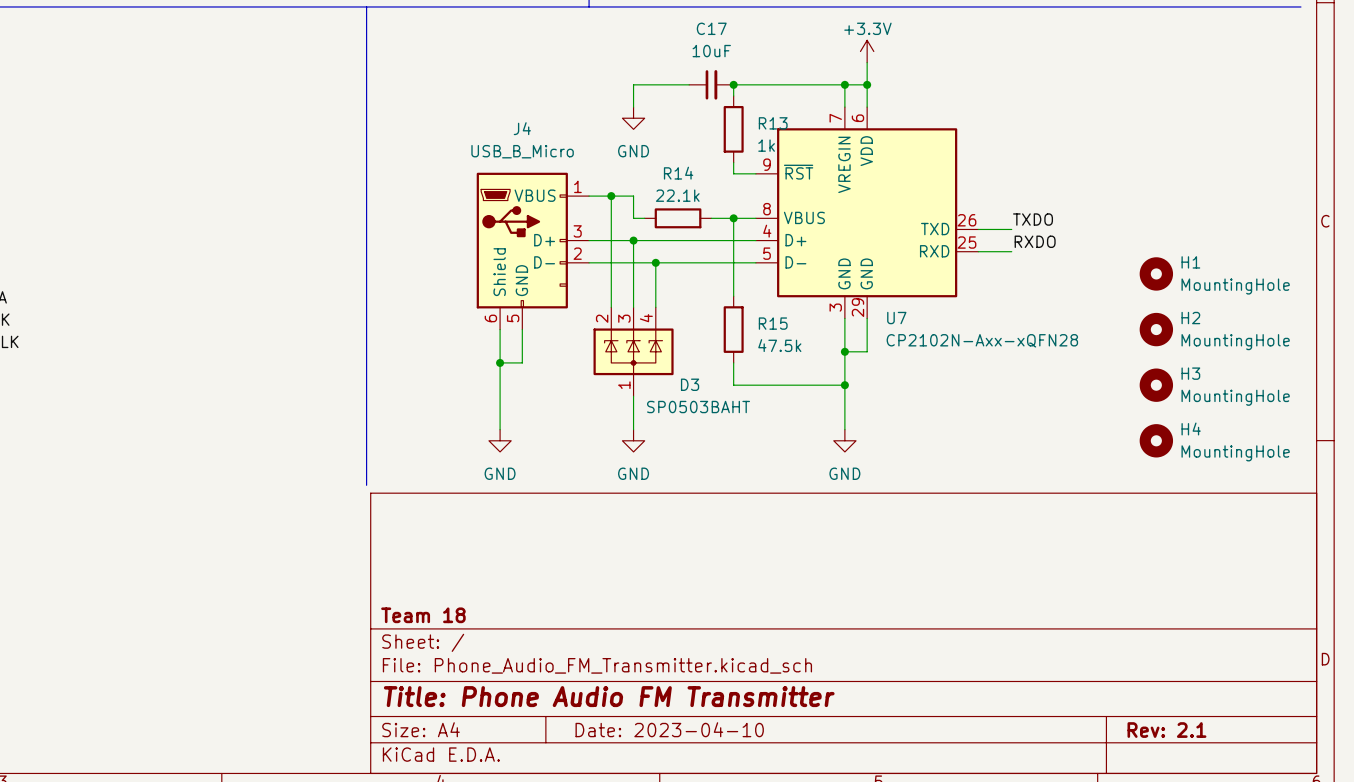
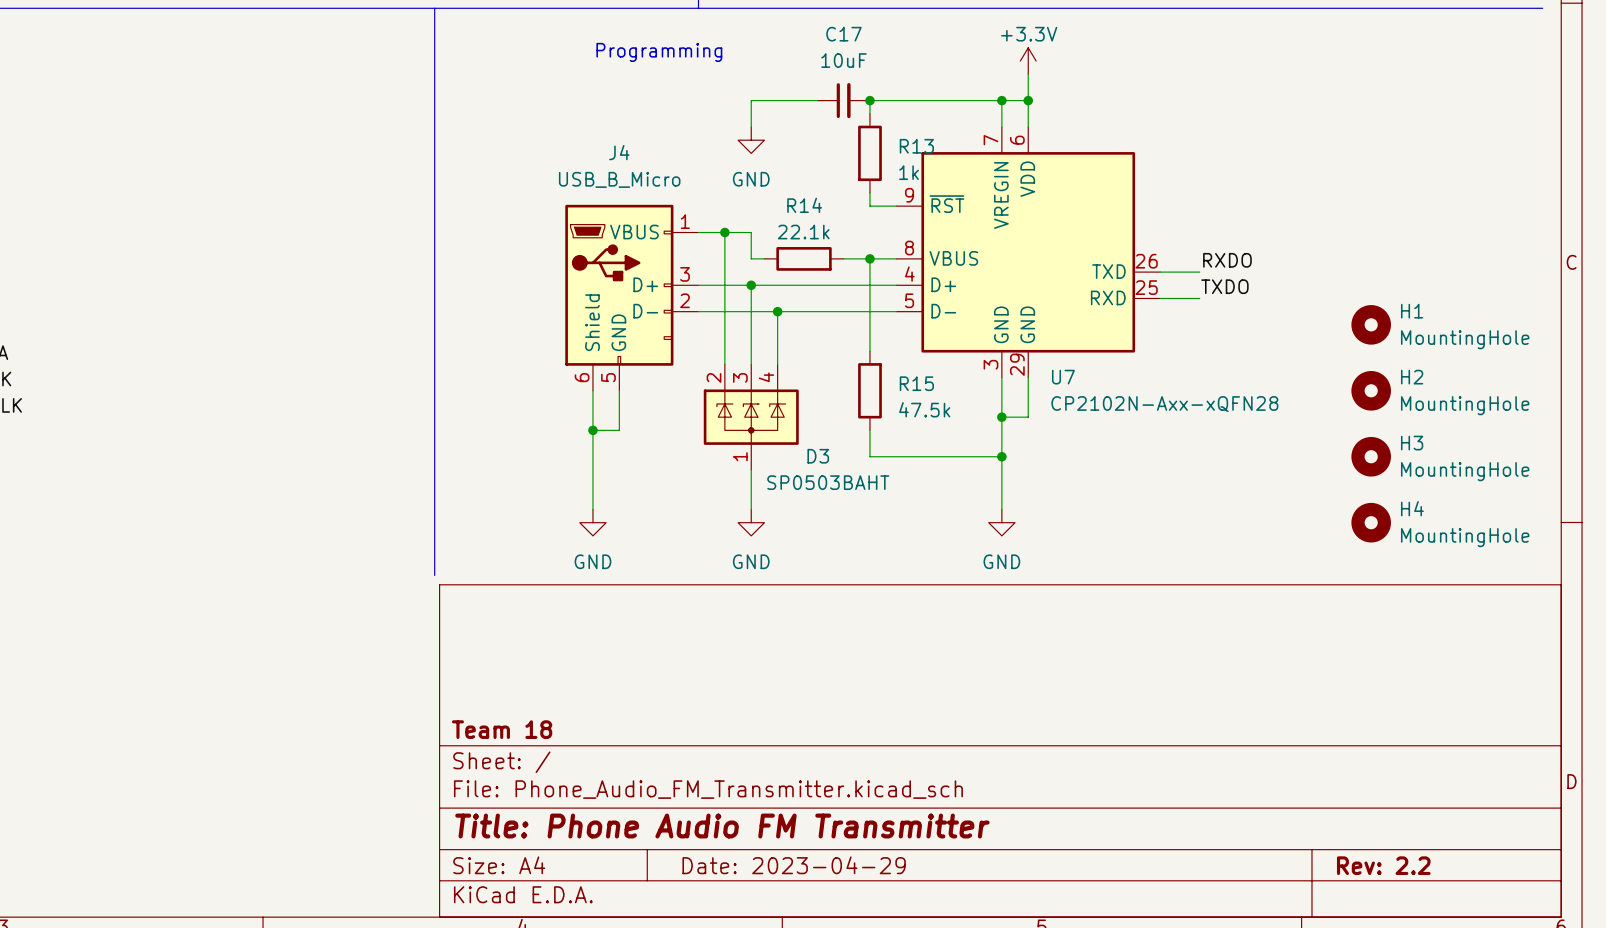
text: none -> Programming (659, 52)
label: TXDO (1033, 219) -> RXDO (1227, 260)
label: RXDO (1035, 241) -> TXDO (1224, 286)
title block: Date: 2023-04-10 (669, 729) -> Date: 2023-04-29 (794, 865)
title block: Rev: 2.1 (1166, 730) -> Rev: 2.2 (1383, 865)

